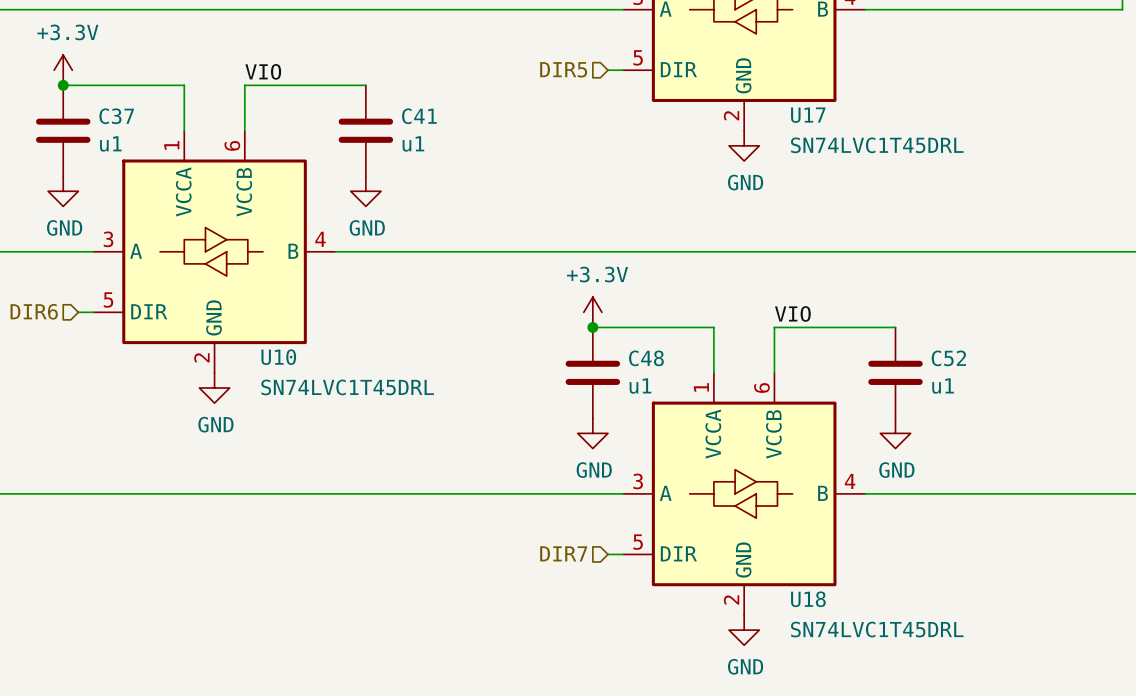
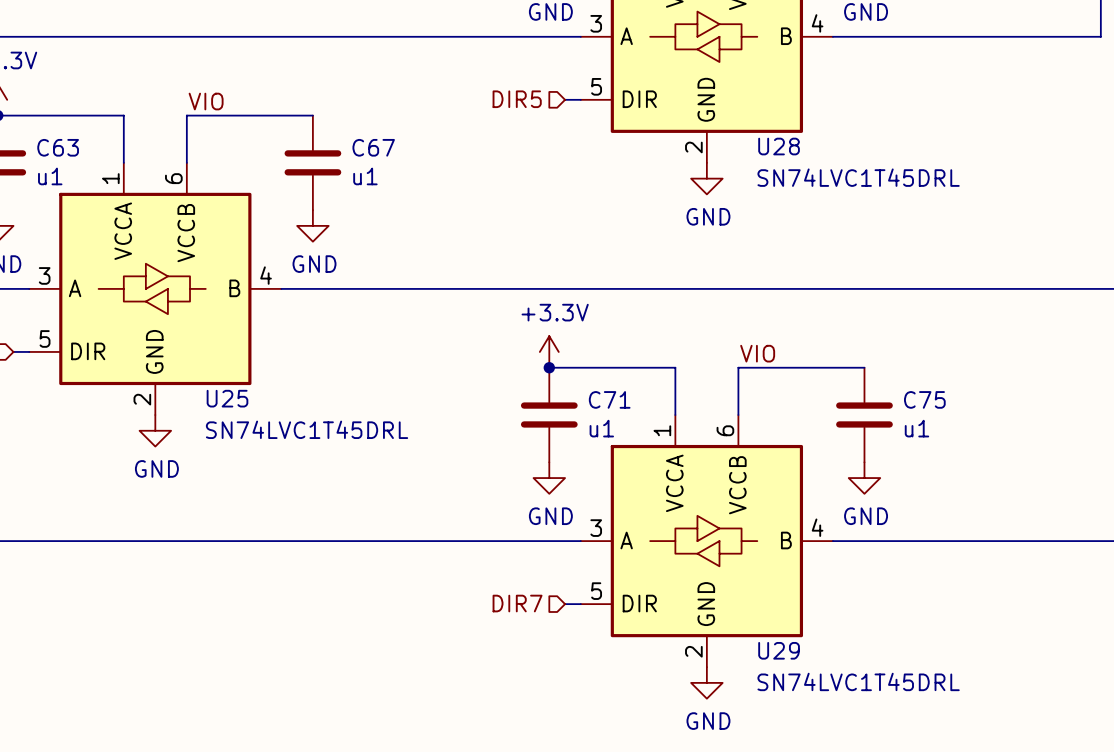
U17 name: U17 (808, 115) -> U28 (779, 146)
C37 name: C37 (116, 116) -> C63 (58, 147)
C41 name: C41 (419, 116) -> C67 (373, 147)
U10 name: U10 (278, 357) -> U25 (227, 398)
C48 name: C48 (646, 358) -> C71 (609, 399)
C52 name: C52 (948, 358) -> C75 (924, 399)
U18 name: U18 (808, 599) -> U29 (779, 650)

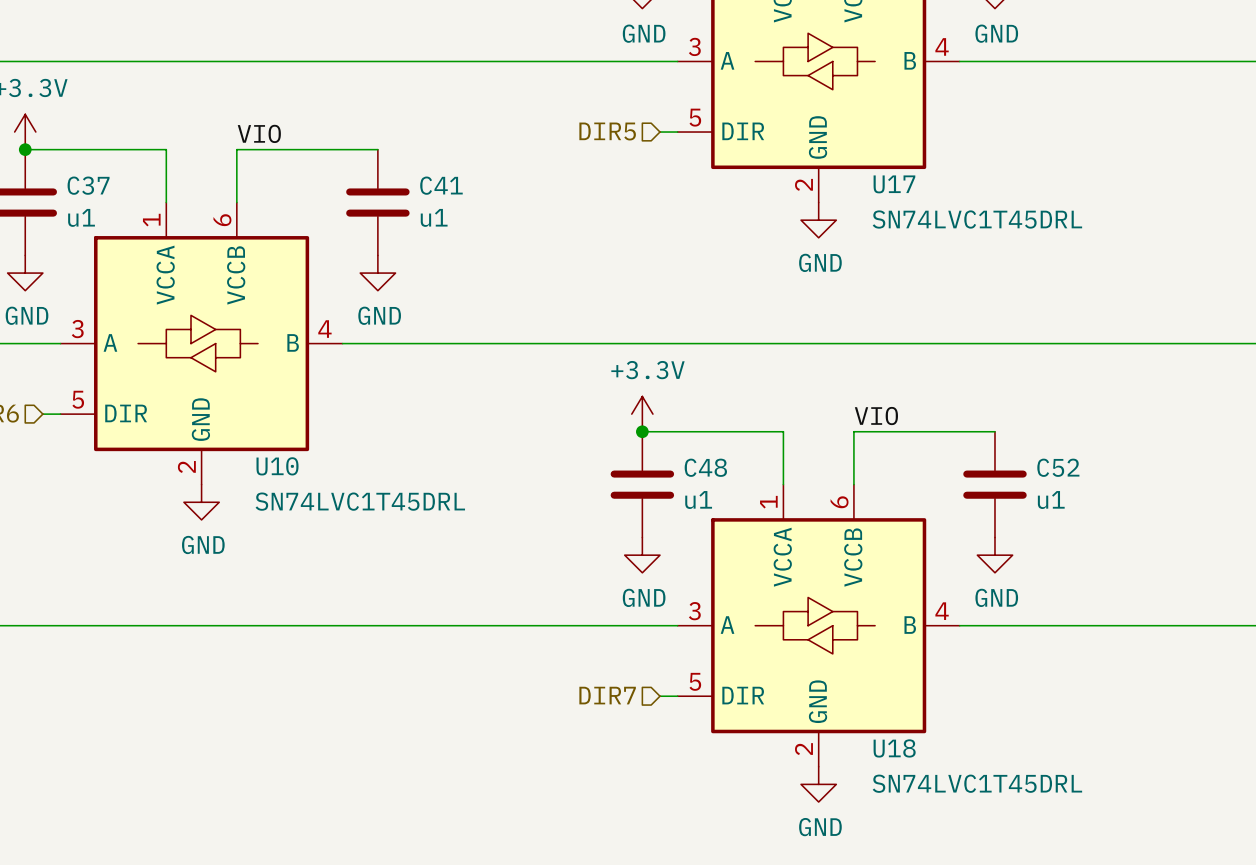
U28 name: U28 (779, 146) -> U17 (894, 184)
C63 name: C63 (58, 147) -> C37 (88, 185)
C67 name: C67 (373, 147) -> C41 (441, 185)
U25 name: U25 (227, 398) -> U10 (277, 466)
C71 name: C71 (609, 399) -> C48 (705, 467)
C75 name: C75 (924, 399) -> C52 (1058, 467)
U29 name: U29 (779, 650) -> U18 (894, 748)

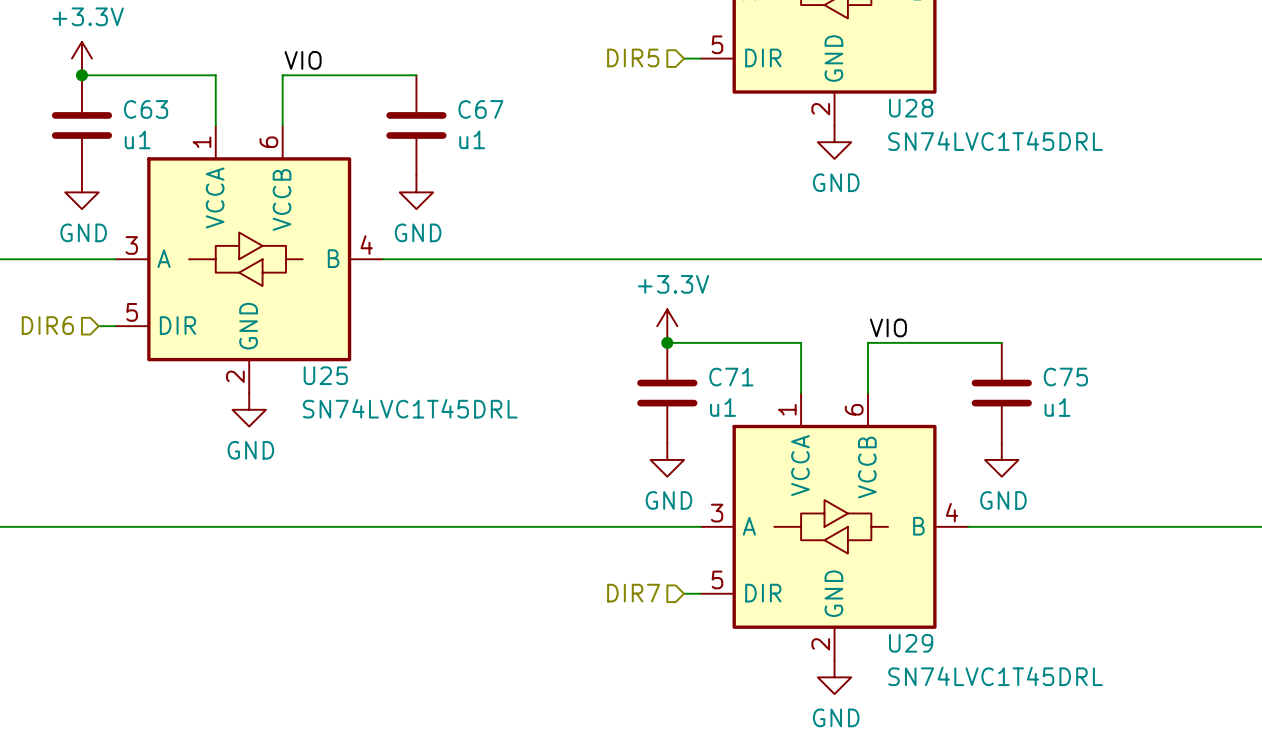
U17 name: U17 (894, 184) -> U28 (911, 108)
C37 name: C37 (88, 185) -> C63 (146, 109)
C41 name: C41 (441, 185) -> C67 (480, 109)
U10 name: U10 (277, 466) -> U25 (325, 375)
C48 name: C48 (705, 467) -> C71 (731, 377)
C52 name: C52 (1058, 467) -> C75 (1065, 377)
U18 name: U18 (894, 748) -> U29 (911, 643)

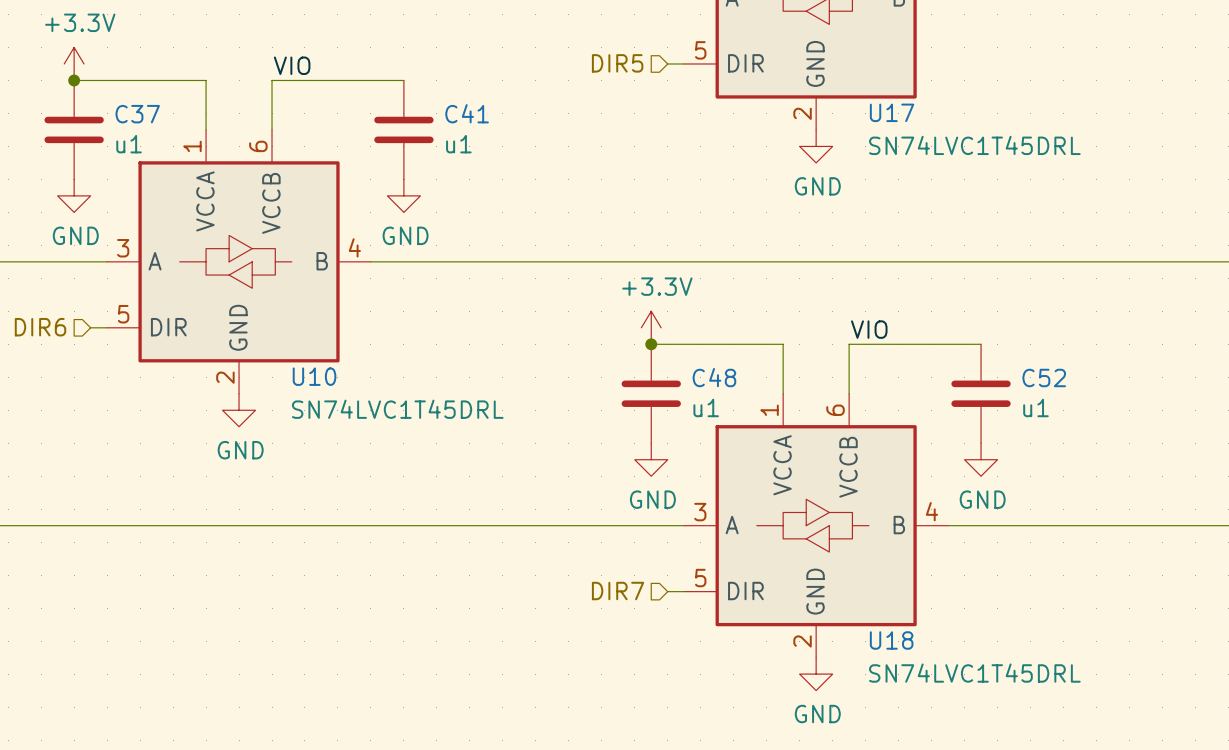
U28 name: U28 (911, 108) -> U17 (892, 112)
C63 name: C63 (146, 109) -> C37 (137, 114)
C67 name: C67 (480, 109) -> C41 (467, 113)
U25 name: U25 (325, 375) -> U10 (314, 376)
C71 name: C71 (731, 377) -> C48 (714, 377)
C75 name: C75 (1065, 377) -> C52 (1044, 377)
U29 name: U29 (911, 643) -> U18 (891, 640)

